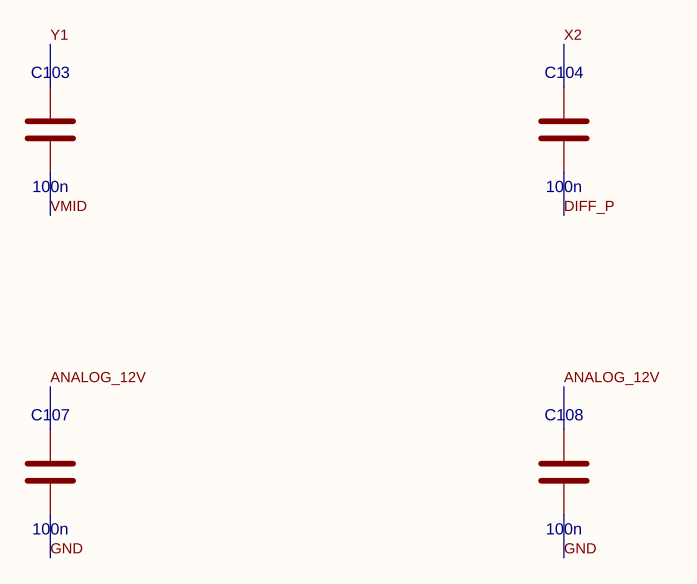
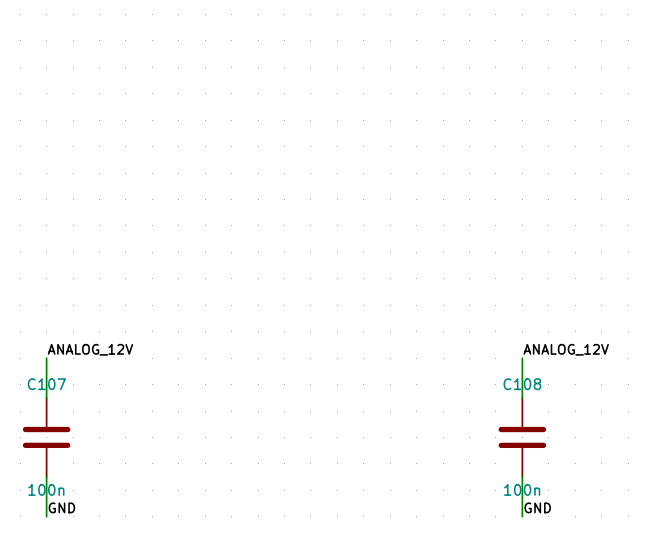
label: Y1 (59, 34) -> none
label: X2 (572, 34) -> none
wire: (50, 44) (50, 87) -> none
wire: (563, 44) (563, 87) -> none
C103: 100n (50, 129) -> none
C104: 100n (563, 129) -> none
wire: (50, 172) (50, 215) -> none
wire: (563, 172) (563, 215) -> none
label: VMID (68, 205) -> none
label: DIFF_P (589, 207) -> none

